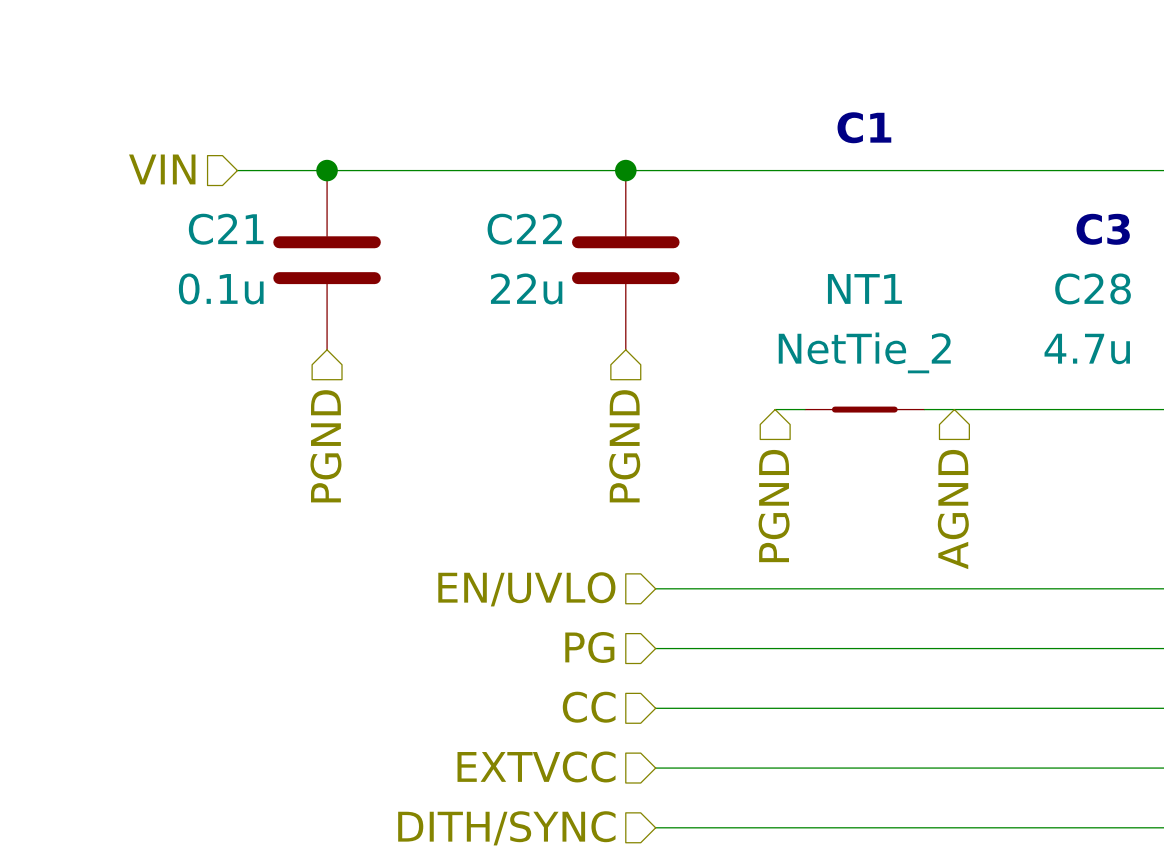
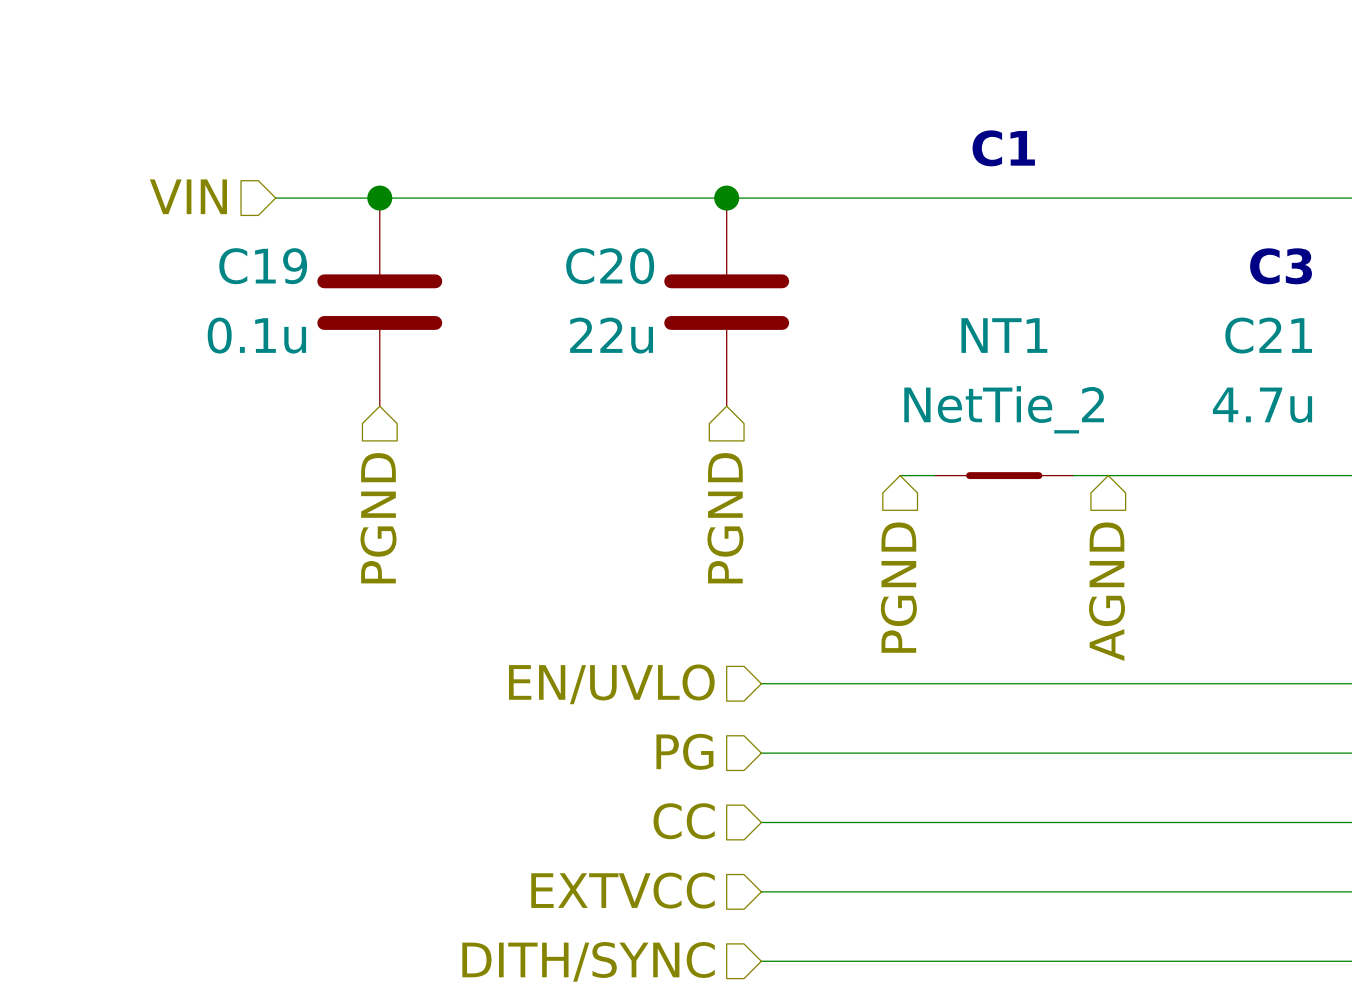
C21 name: C21 (226, 229) -> C19 (263, 266)
C22 name: C22 (524, 229) -> C20 (610, 266)
C28 name: C28 (1093, 288) -> C21 (1268, 335)

